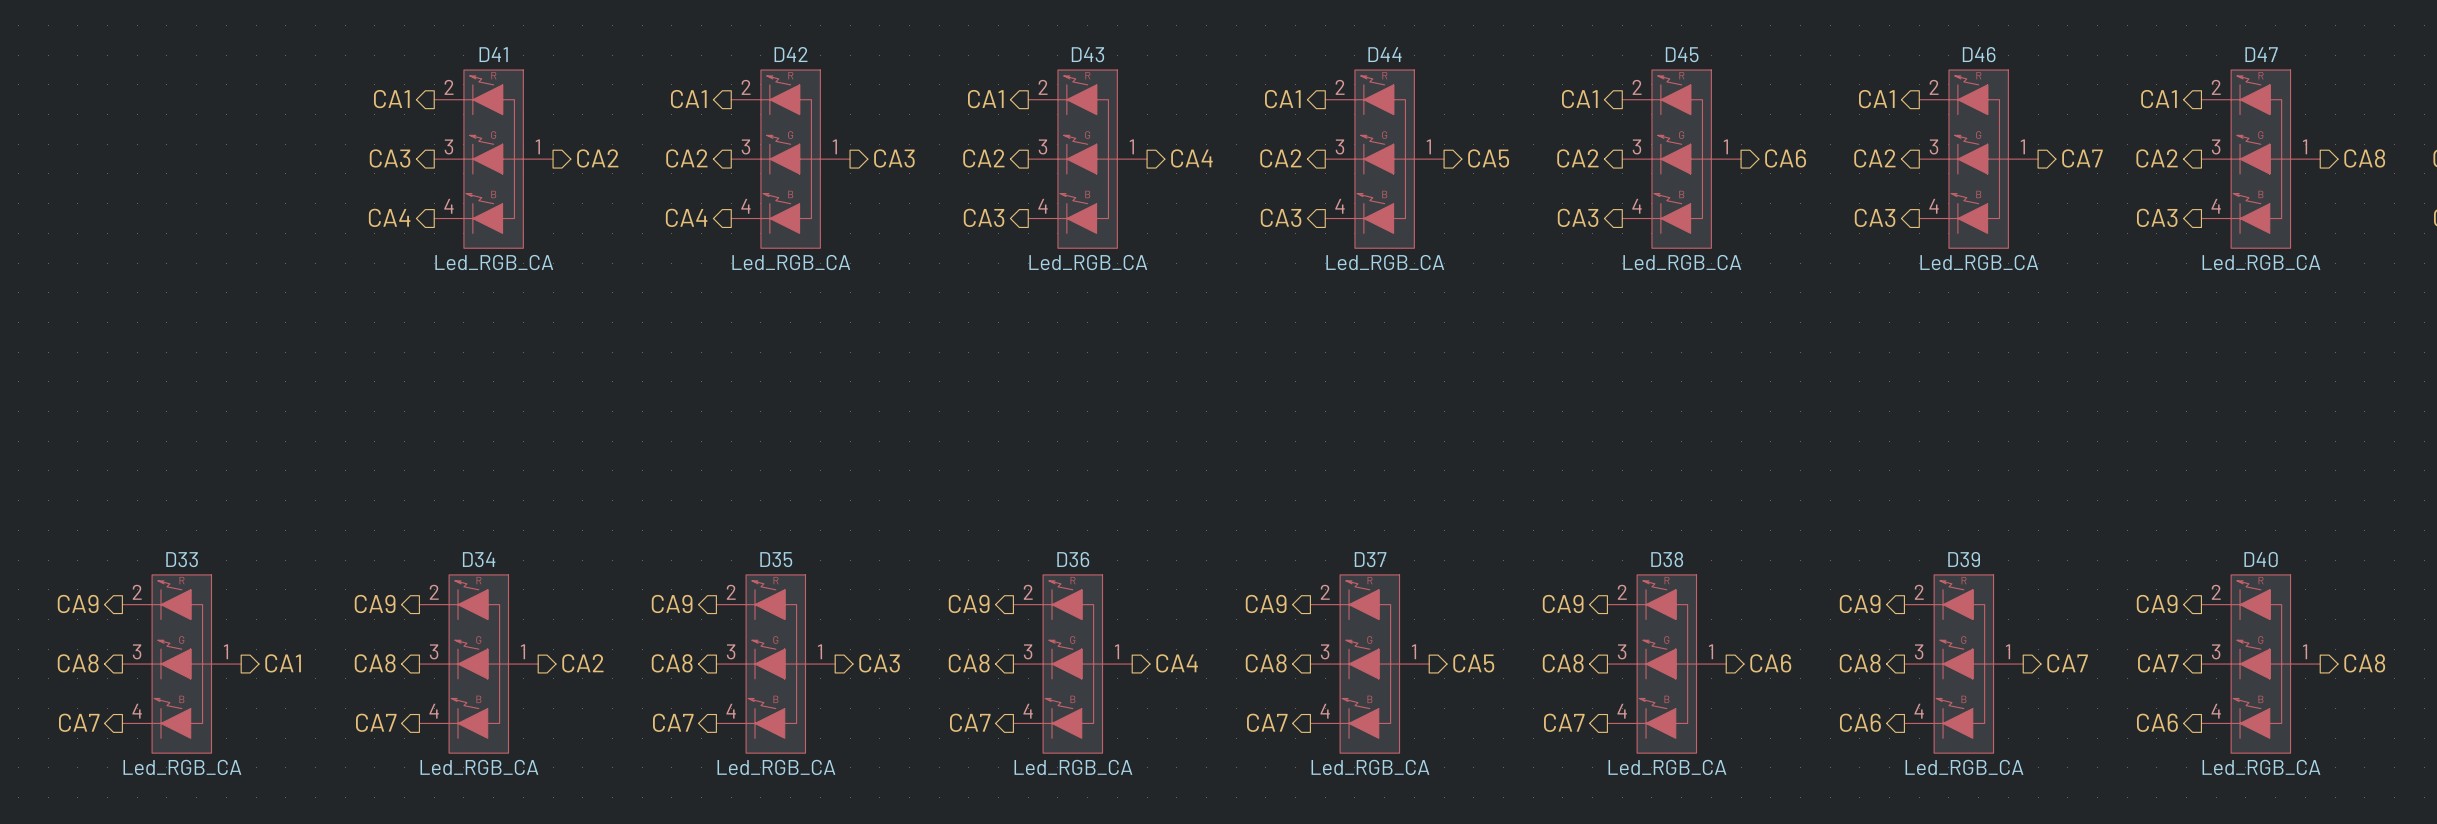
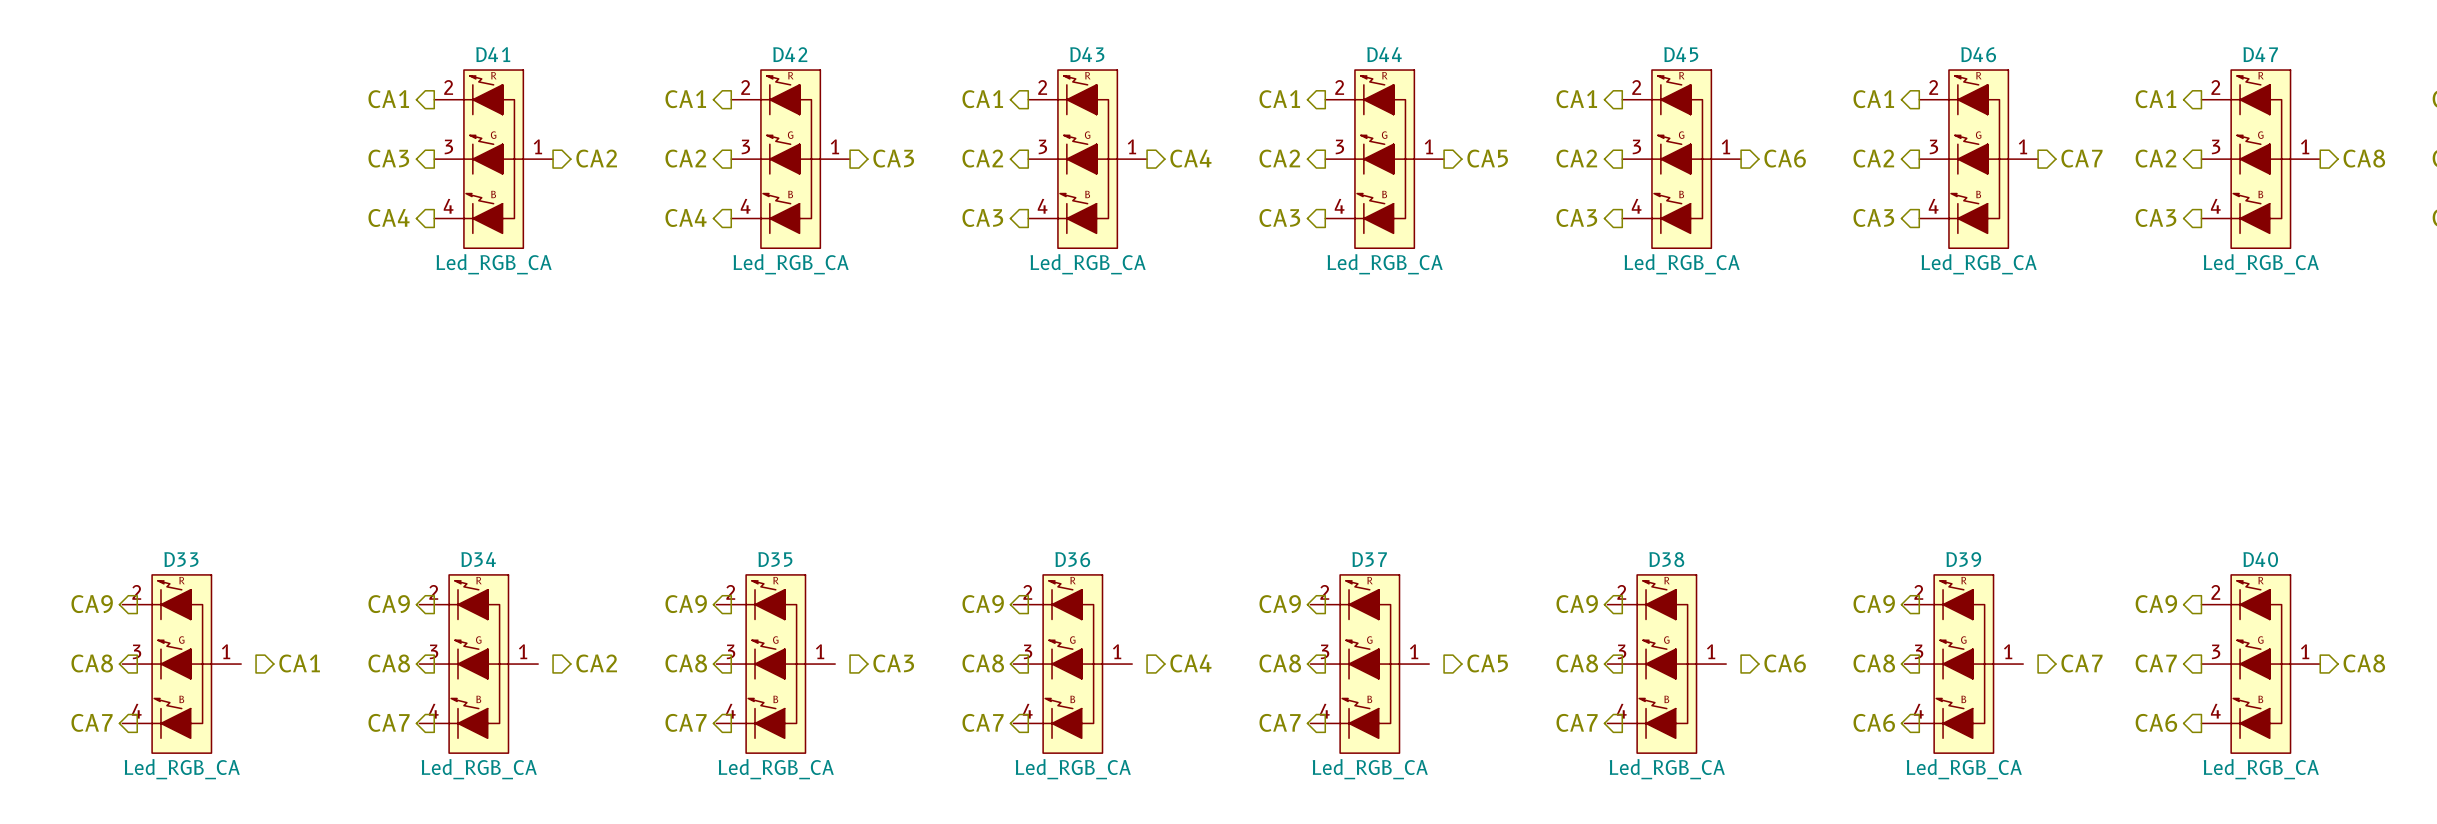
hierarchical label position: CA9 (78, 603) -> CA9 (92, 604)
hierarchical label position: CA9 (375, 603) -> CA9 (389, 604)
hierarchical label position: CA9 (672, 603) -> CA9 (686, 604)
hierarchical label position: CA9 (969, 603) -> CA9 (983, 604)
hierarchical label position: CA9 (1266, 603) -> CA9 (1280, 604)
hierarchical label position: CA9 (1563, 603) -> CA9 (1577, 604)
hierarchical label position: CA9 (1860, 603) -> CA9 (1874, 604)
hierarchical label position: CA8 (78, 663) -> CA8 (92, 663)
hierarchical label position: CA1 (283, 663) -> CA1 (299, 663)
hierarchical label position: CA8 (375, 663) -> CA8 (389, 663)
hierarchical label position: CA2 (582, 663) -> CA2 (596, 663)
hierarchical label position: CA8 (672, 663) -> CA8 (686, 663)
hierarchical label position: CA3 (879, 663) -> CA3 (893, 663)
hierarchical label position: CA8 (969, 663) -> CA8 (983, 663)
hierarchical label position: CA4 (1177, 663) -> CA4 (1190, 663)
hierarchical label position: CA8 (1266, 663) -> CA8 (1280, 663)
hierarchical label position: CA5 (1473, 663) -> CA5 (1487, 663)
hierarchical label position: CA8 (1563, 663) -> CA8 (1577, 663)
hierarchical label position: CA6 (1770, 663) -> CA6 (1785, 663)
hierarchical label position: CA8 (1860, 663) -> CA8 (1874, 663)
hierarchical label position: CA7 (2067, 663) -> CA7 (2081, 663)
hierarchical label position: CA7 (79, 722) -> CA7 (92, 722)
hierarchical label position: CA7 (376, 722) -> CA7 (389, 722)
hierarchical label position: CA7 (673, 722) -> CA7 (686, 722)
hierarchical label position: CA7 (970, 722) -> CA7 (983, 722)
hierarchical label position: CA7 (1267, 722) -> CA7 (1280, 722)
hierarchical label position: CA7 (1564, 722) -> CA7 (1577, 722)
hierarchical label position: CA6 (1860, 722) -> CA6 (1874, 722)

